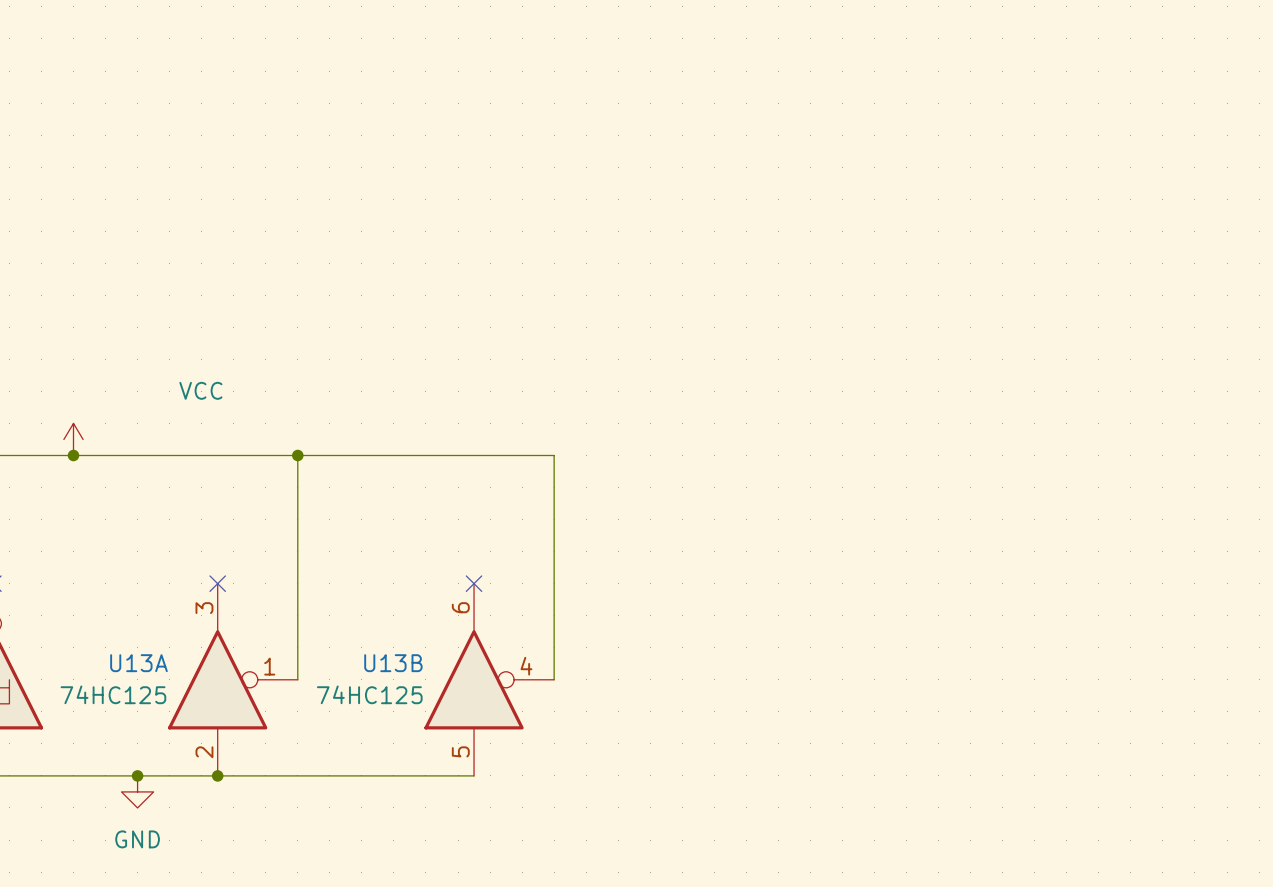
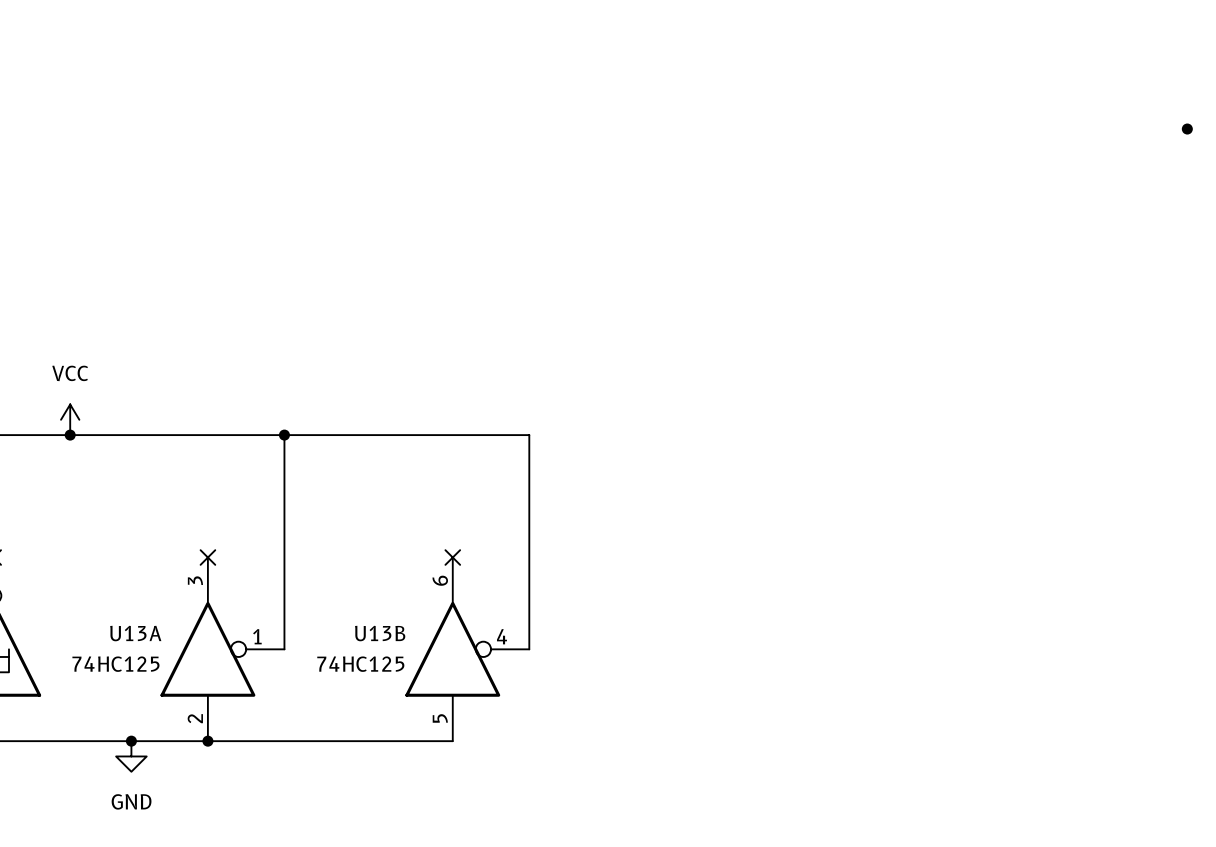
junction: none -> (1187, 129)
power symbol text position: VCC (200, 390) -> VCC (70, 373)

